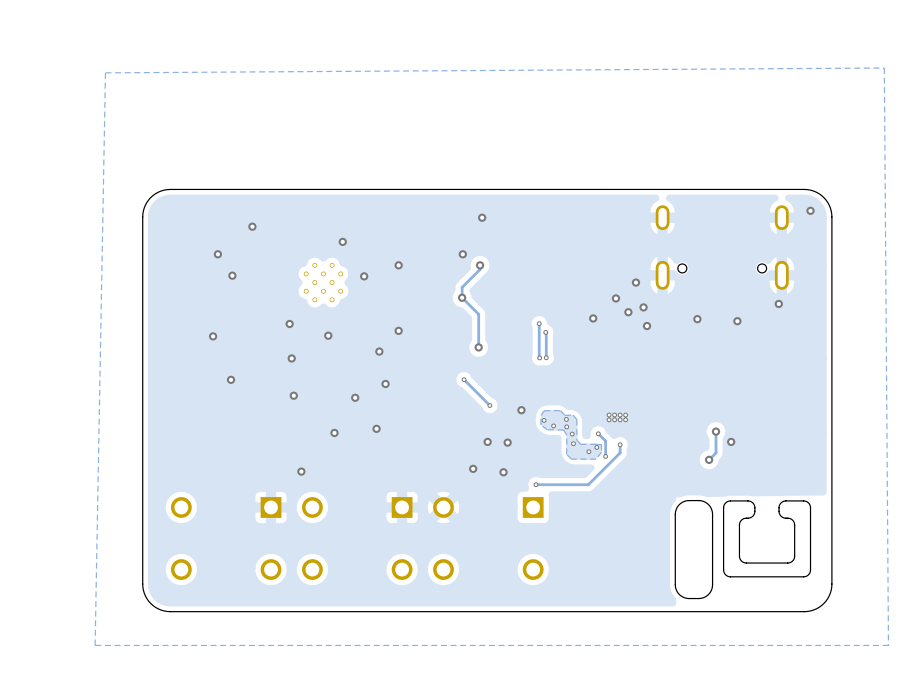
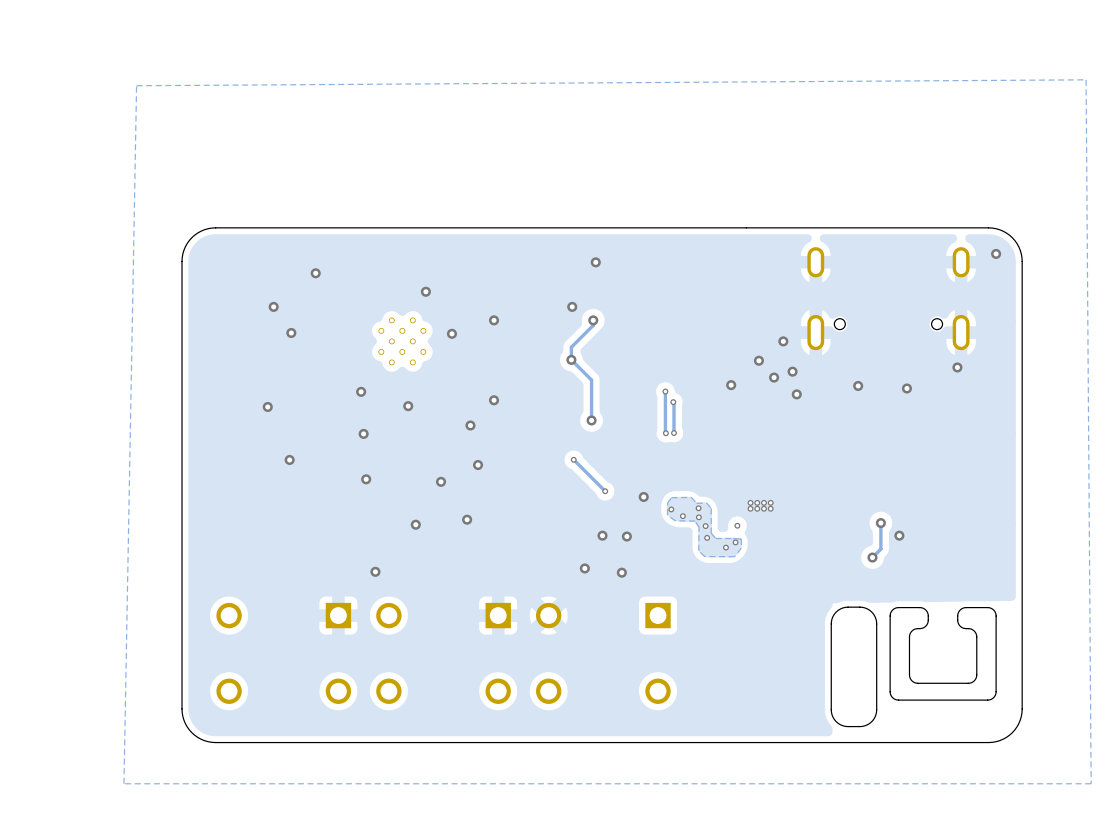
track: (598, 433) (605, 441) (605, 457) -> none
track: (620, 444) (620, 452) (588, 484) (535, 484) -> none
via: (620, 444) -> none
via: (605, 456) -> none
via: (535, 484) -> none

